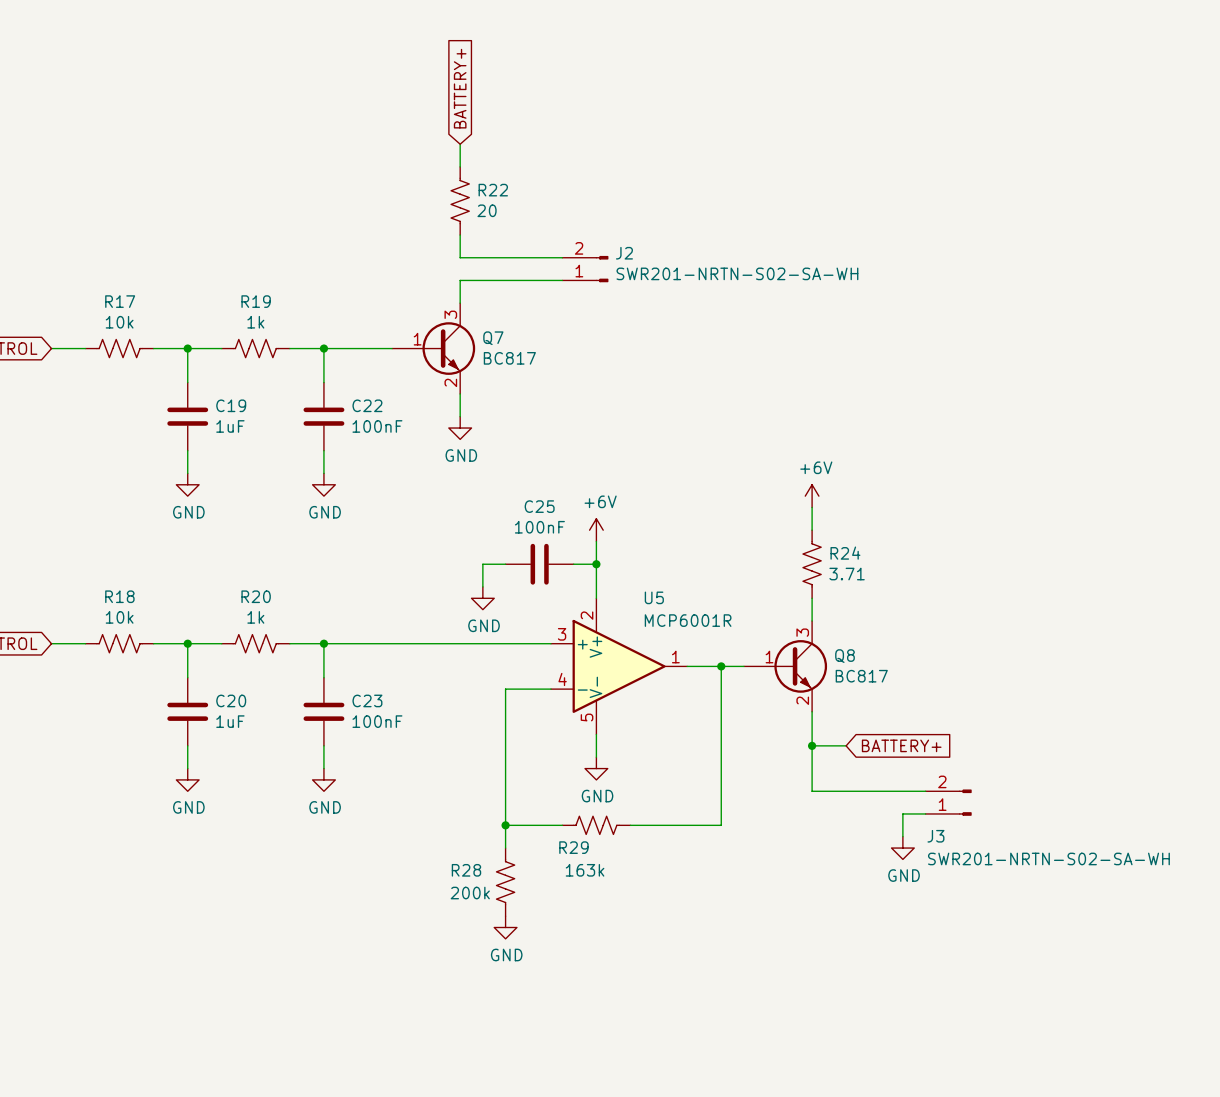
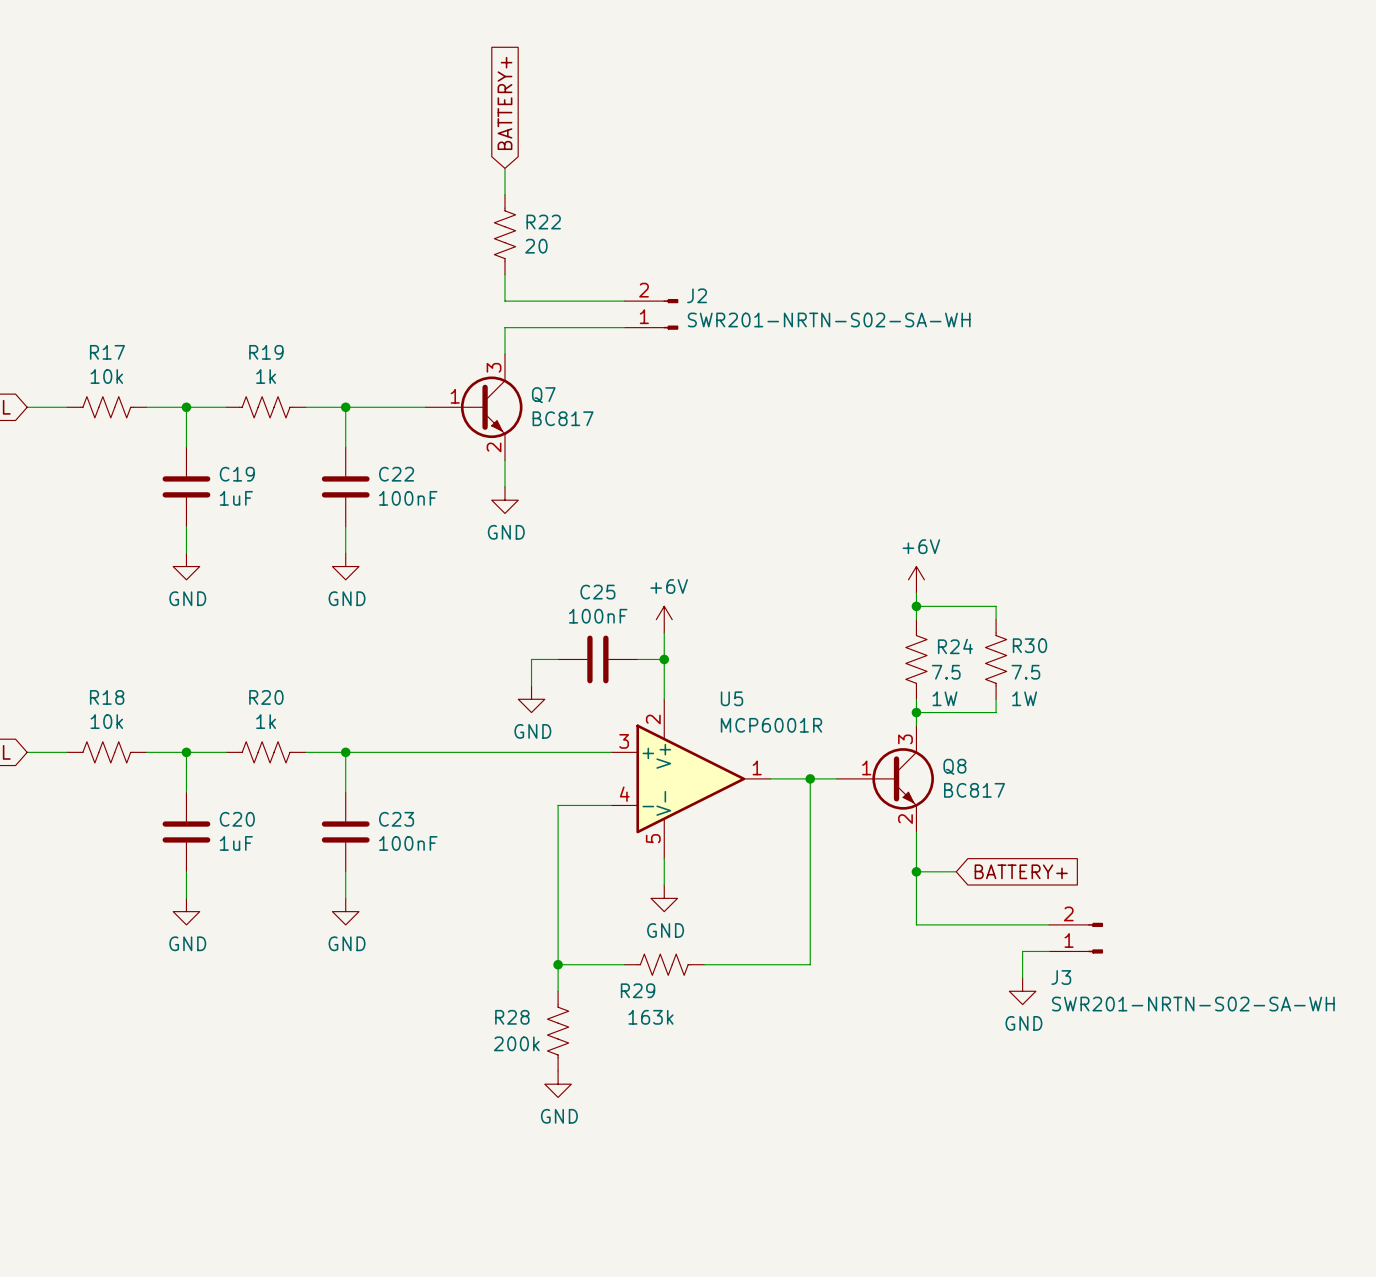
wire: none -> (916, 606) (996, 606) (996, 619)
junction: none -> (916, 606)
R30: none -> 7.5 (996, 659)
R24 value: 3.71 (847, 574) -> 7.5 (946, 672)
R24 text: none -> 1W (944, 698)
wire: none -> (996, 699) (996, 712) (916, 712)
junction: none -> (916, 712)

